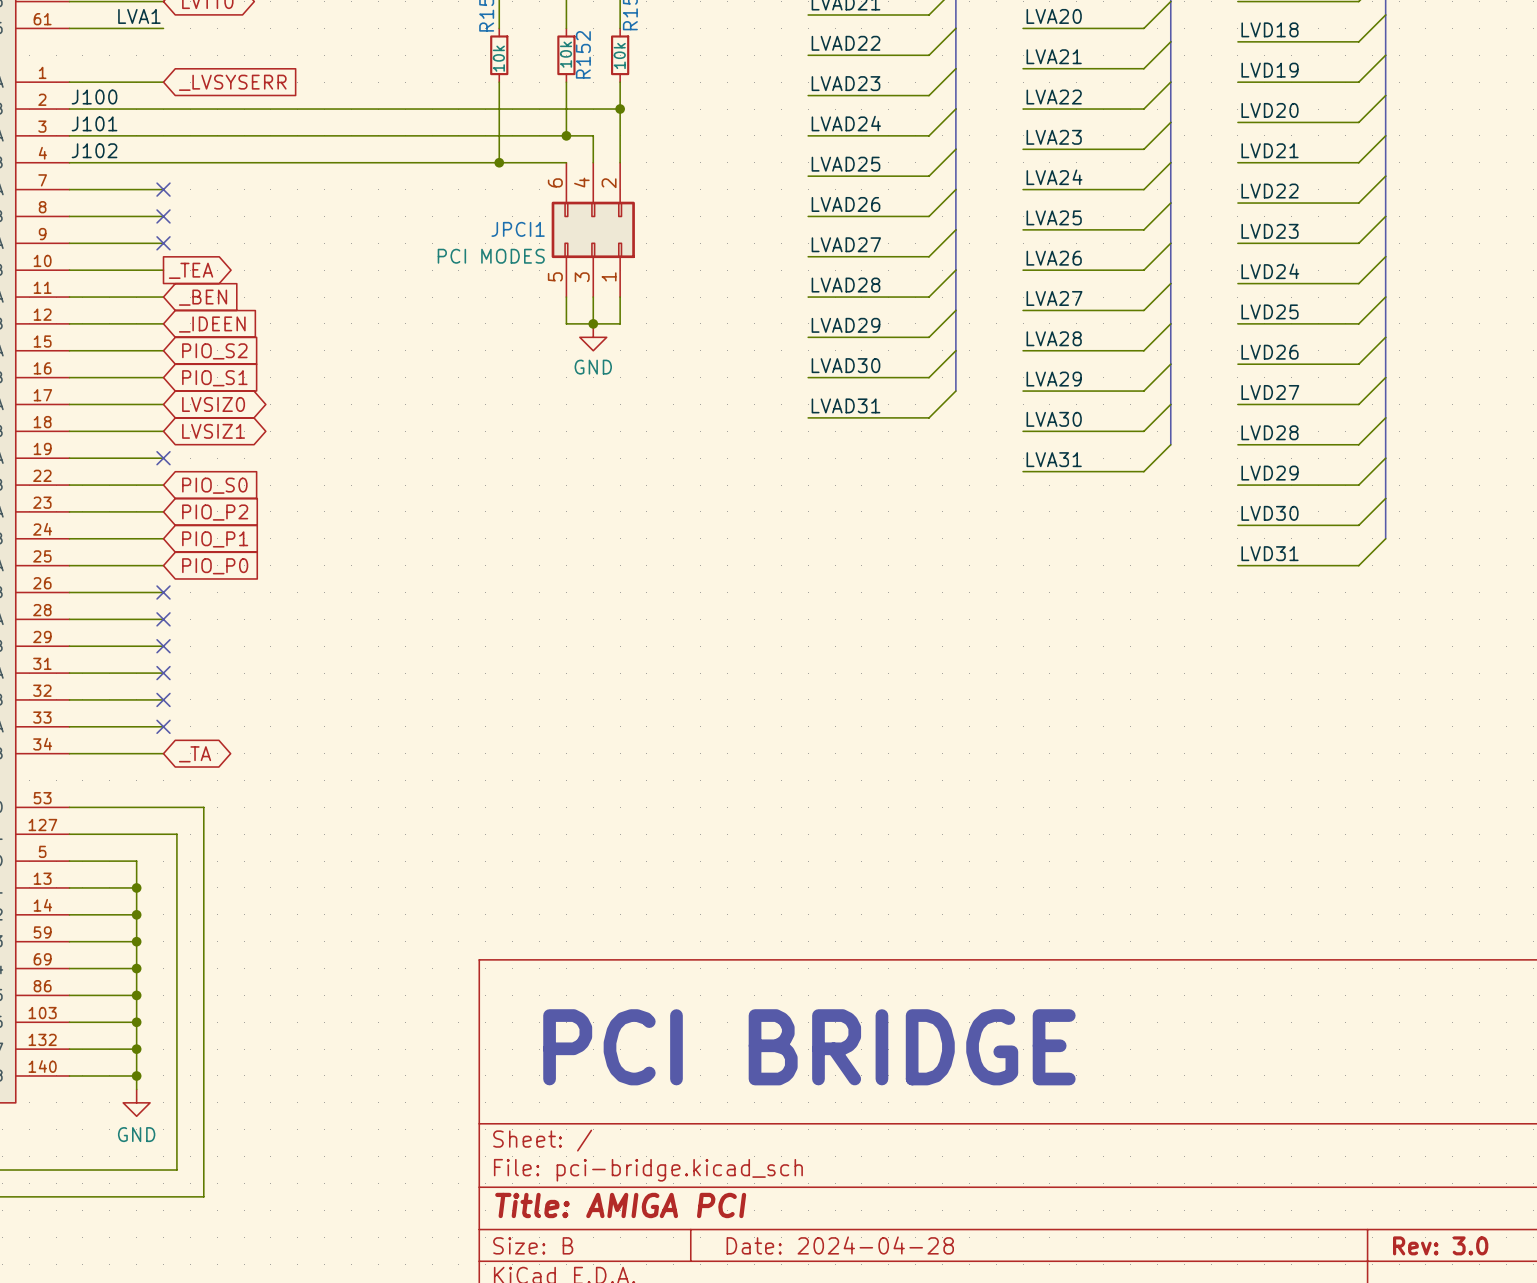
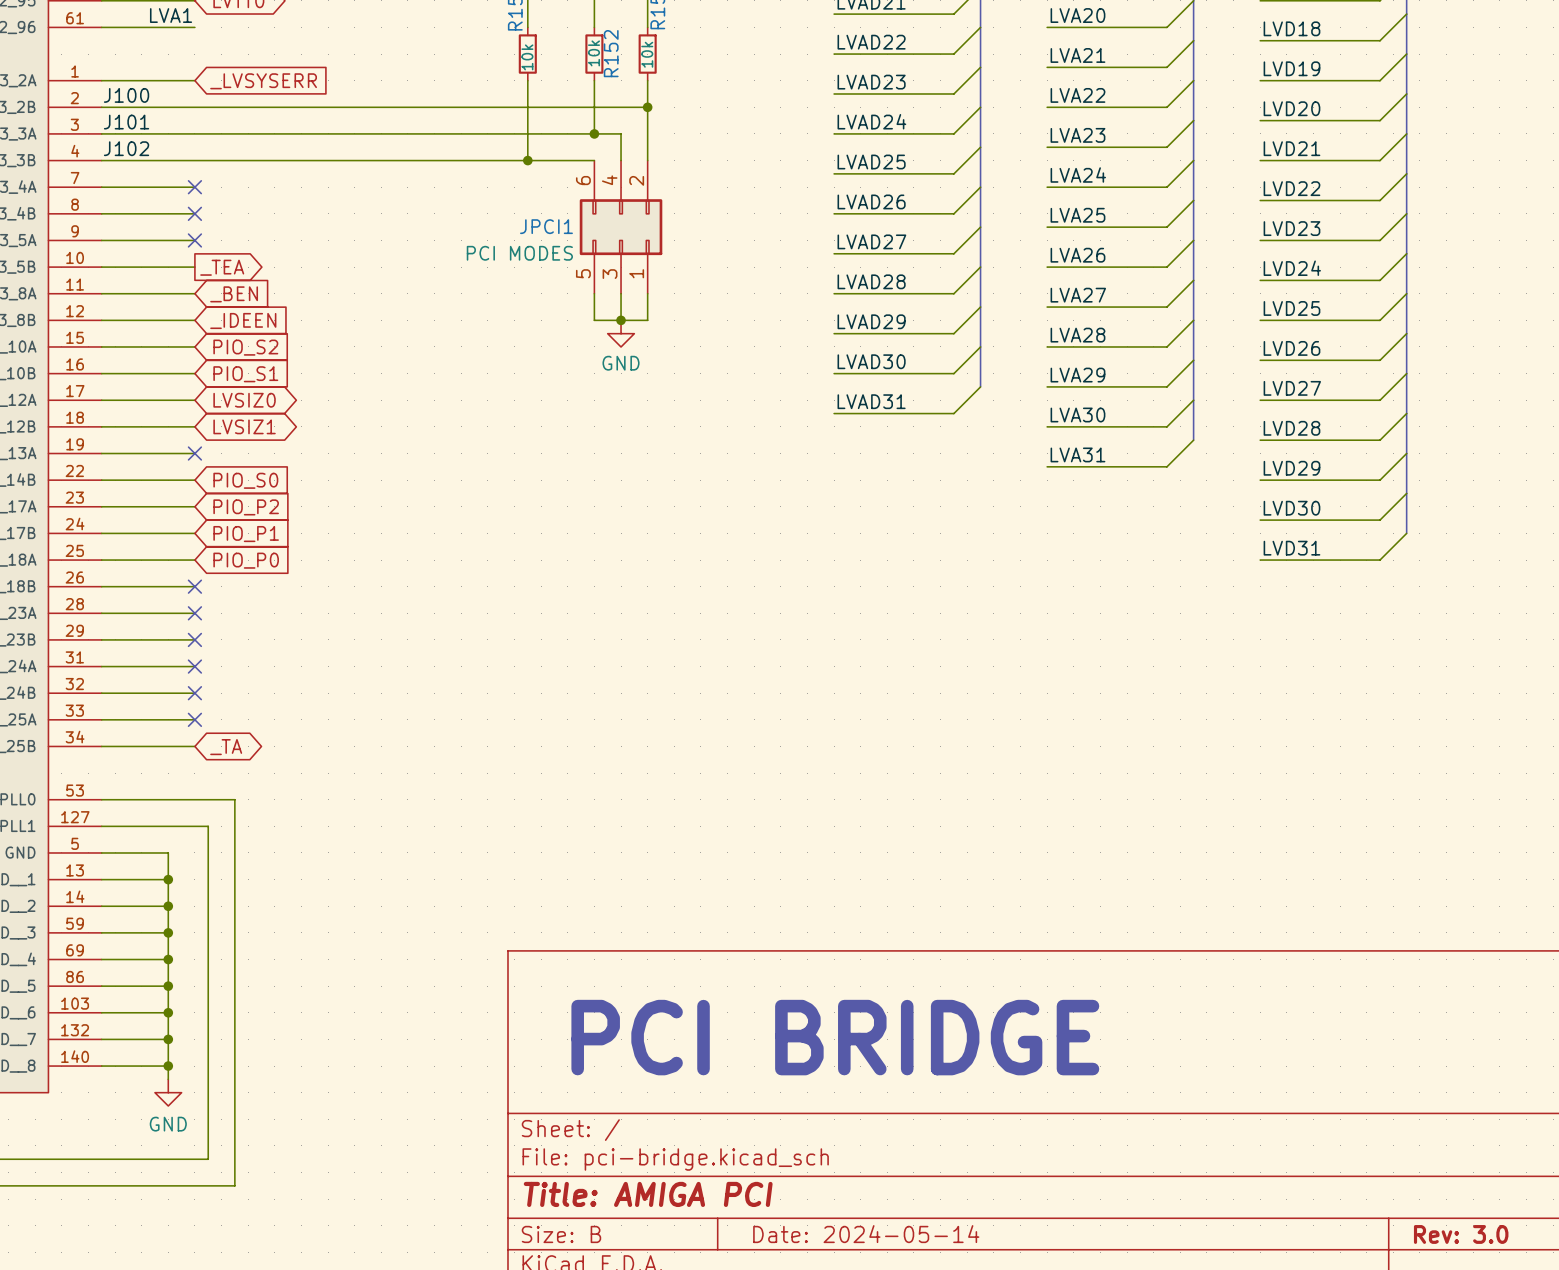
title block: Date: 2024-04-28 (840, 1245) -> Date: 2024-05-14 (866, 1234)

